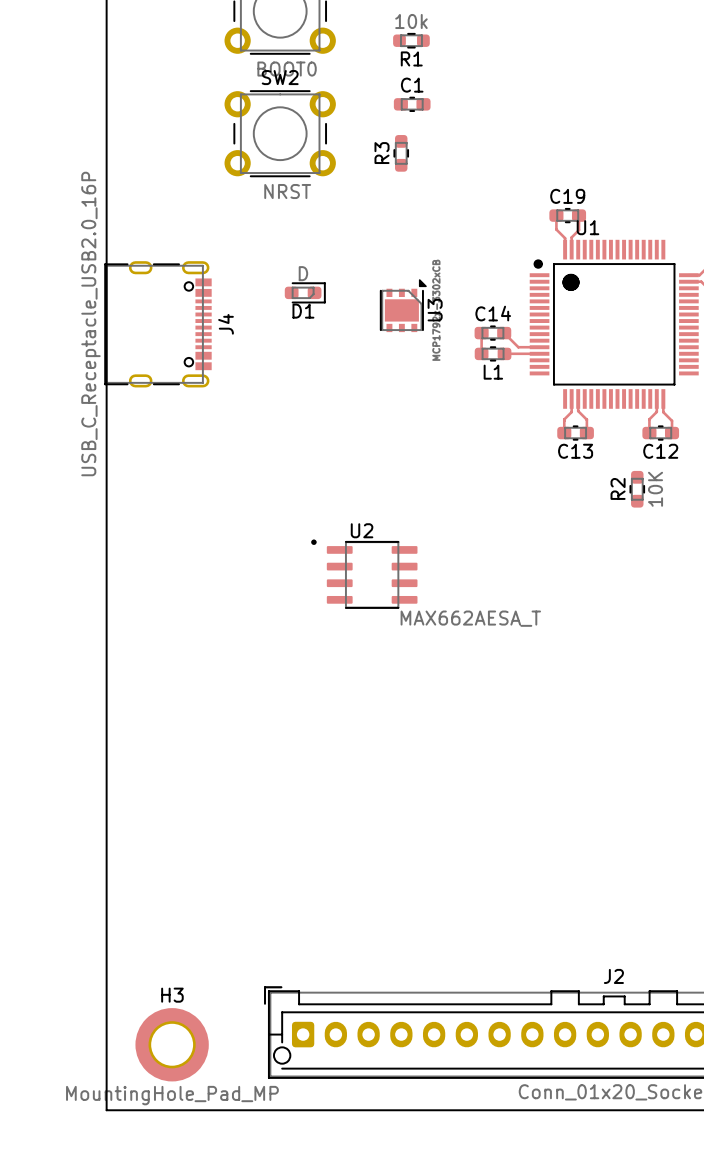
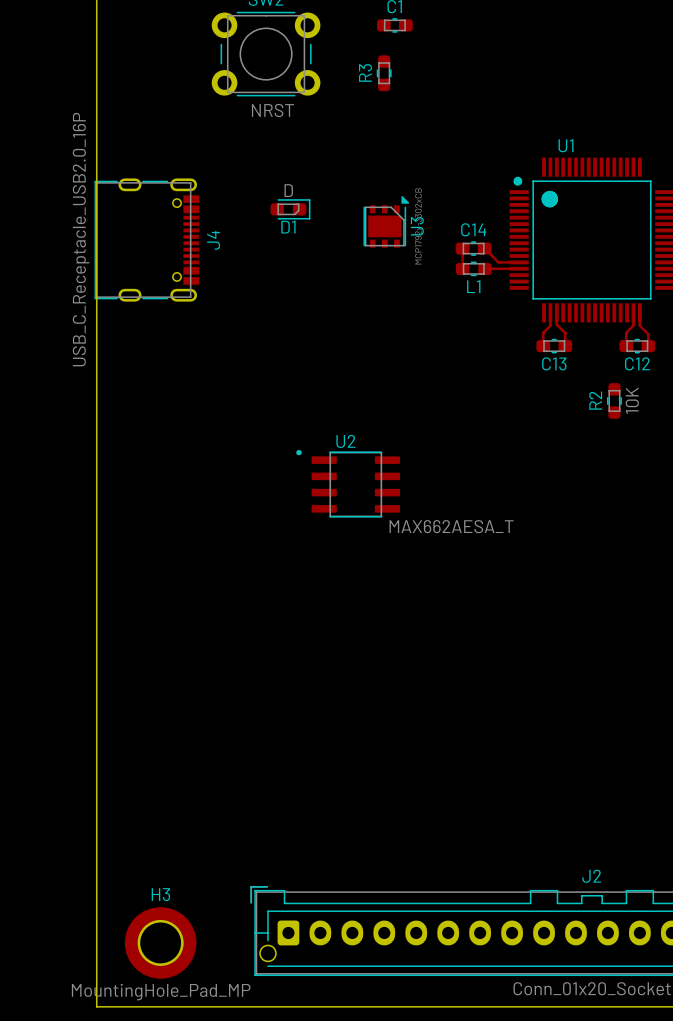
track: (556, 215) (556, 229) (565, 238) (565, 249) -> none
C19: (567, 215) -> none
track: (579, 215) (579, 230) (571, 237) (571, 249) -> none

